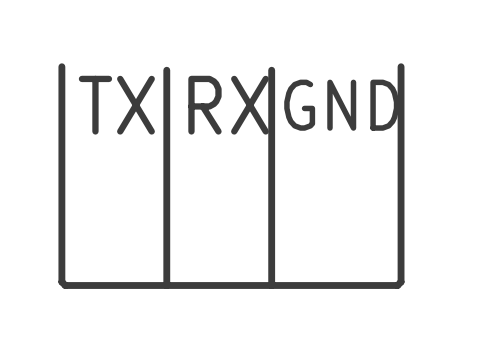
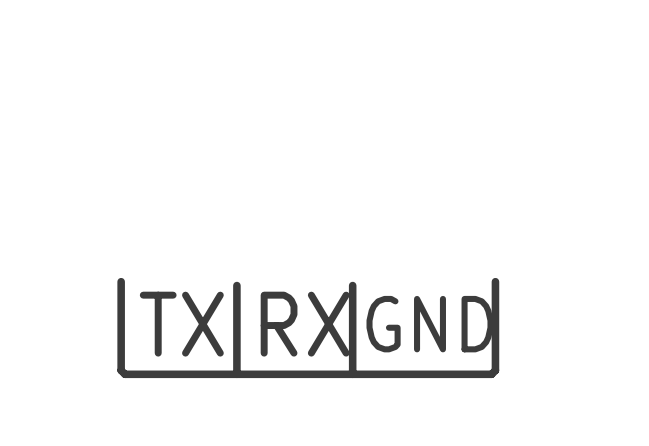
line: (61, 66) (61, 201) -> none
line: (401, 66) (401, 201) -> none
line: (166, 70) (166, 205) -> none
line: (271, 70) (271, 205) -> none
text position: TX (116, 105) -> TX (181, 324)
text position: RX (228, 105) -> RX (305, 324)
text position: GND (341, 105) -> GND (430, 324)

